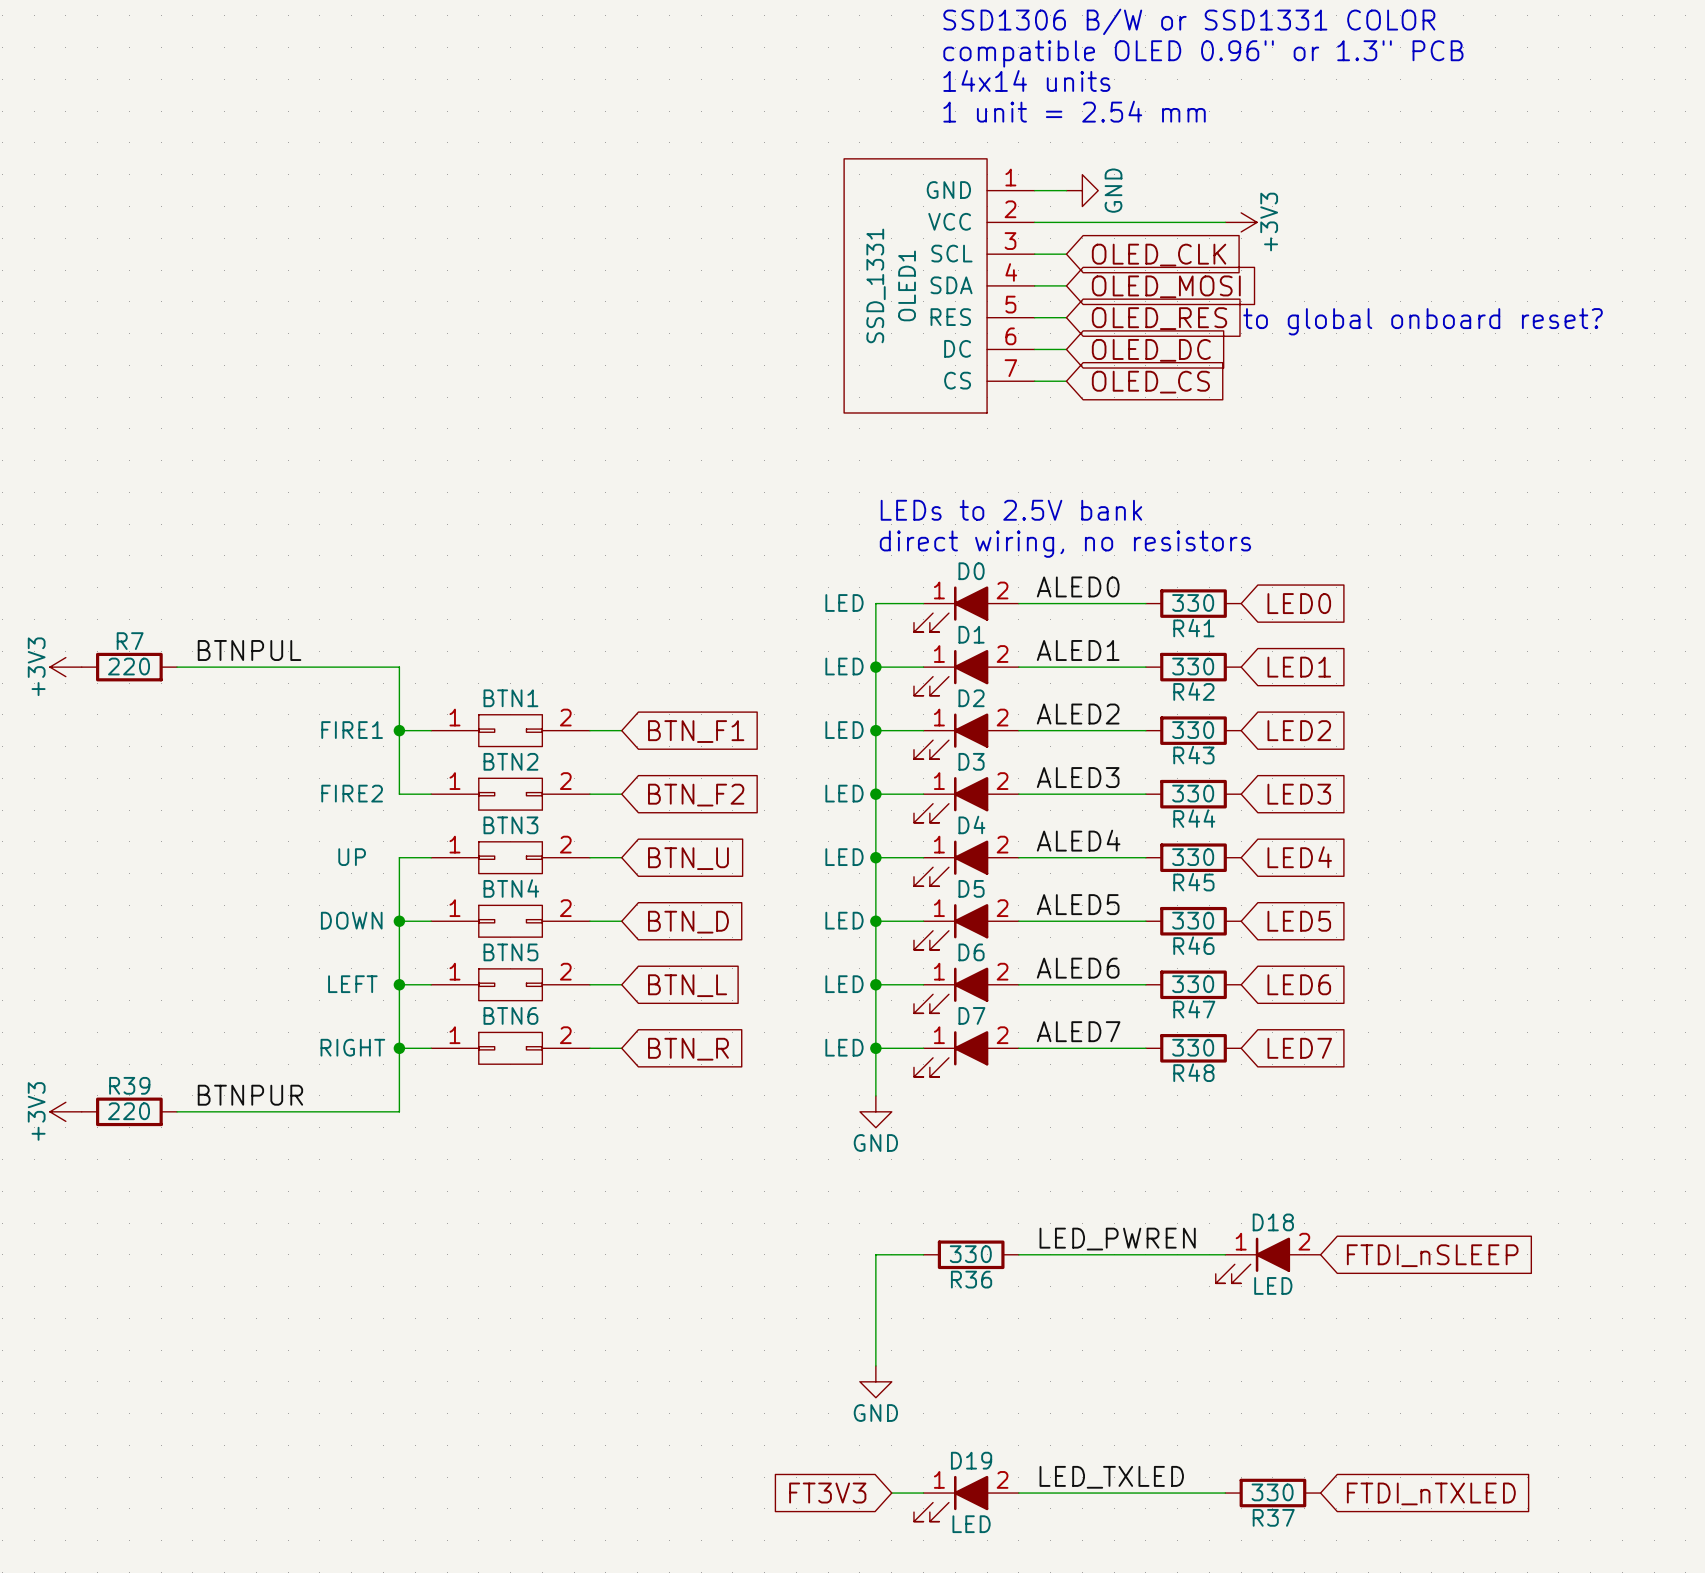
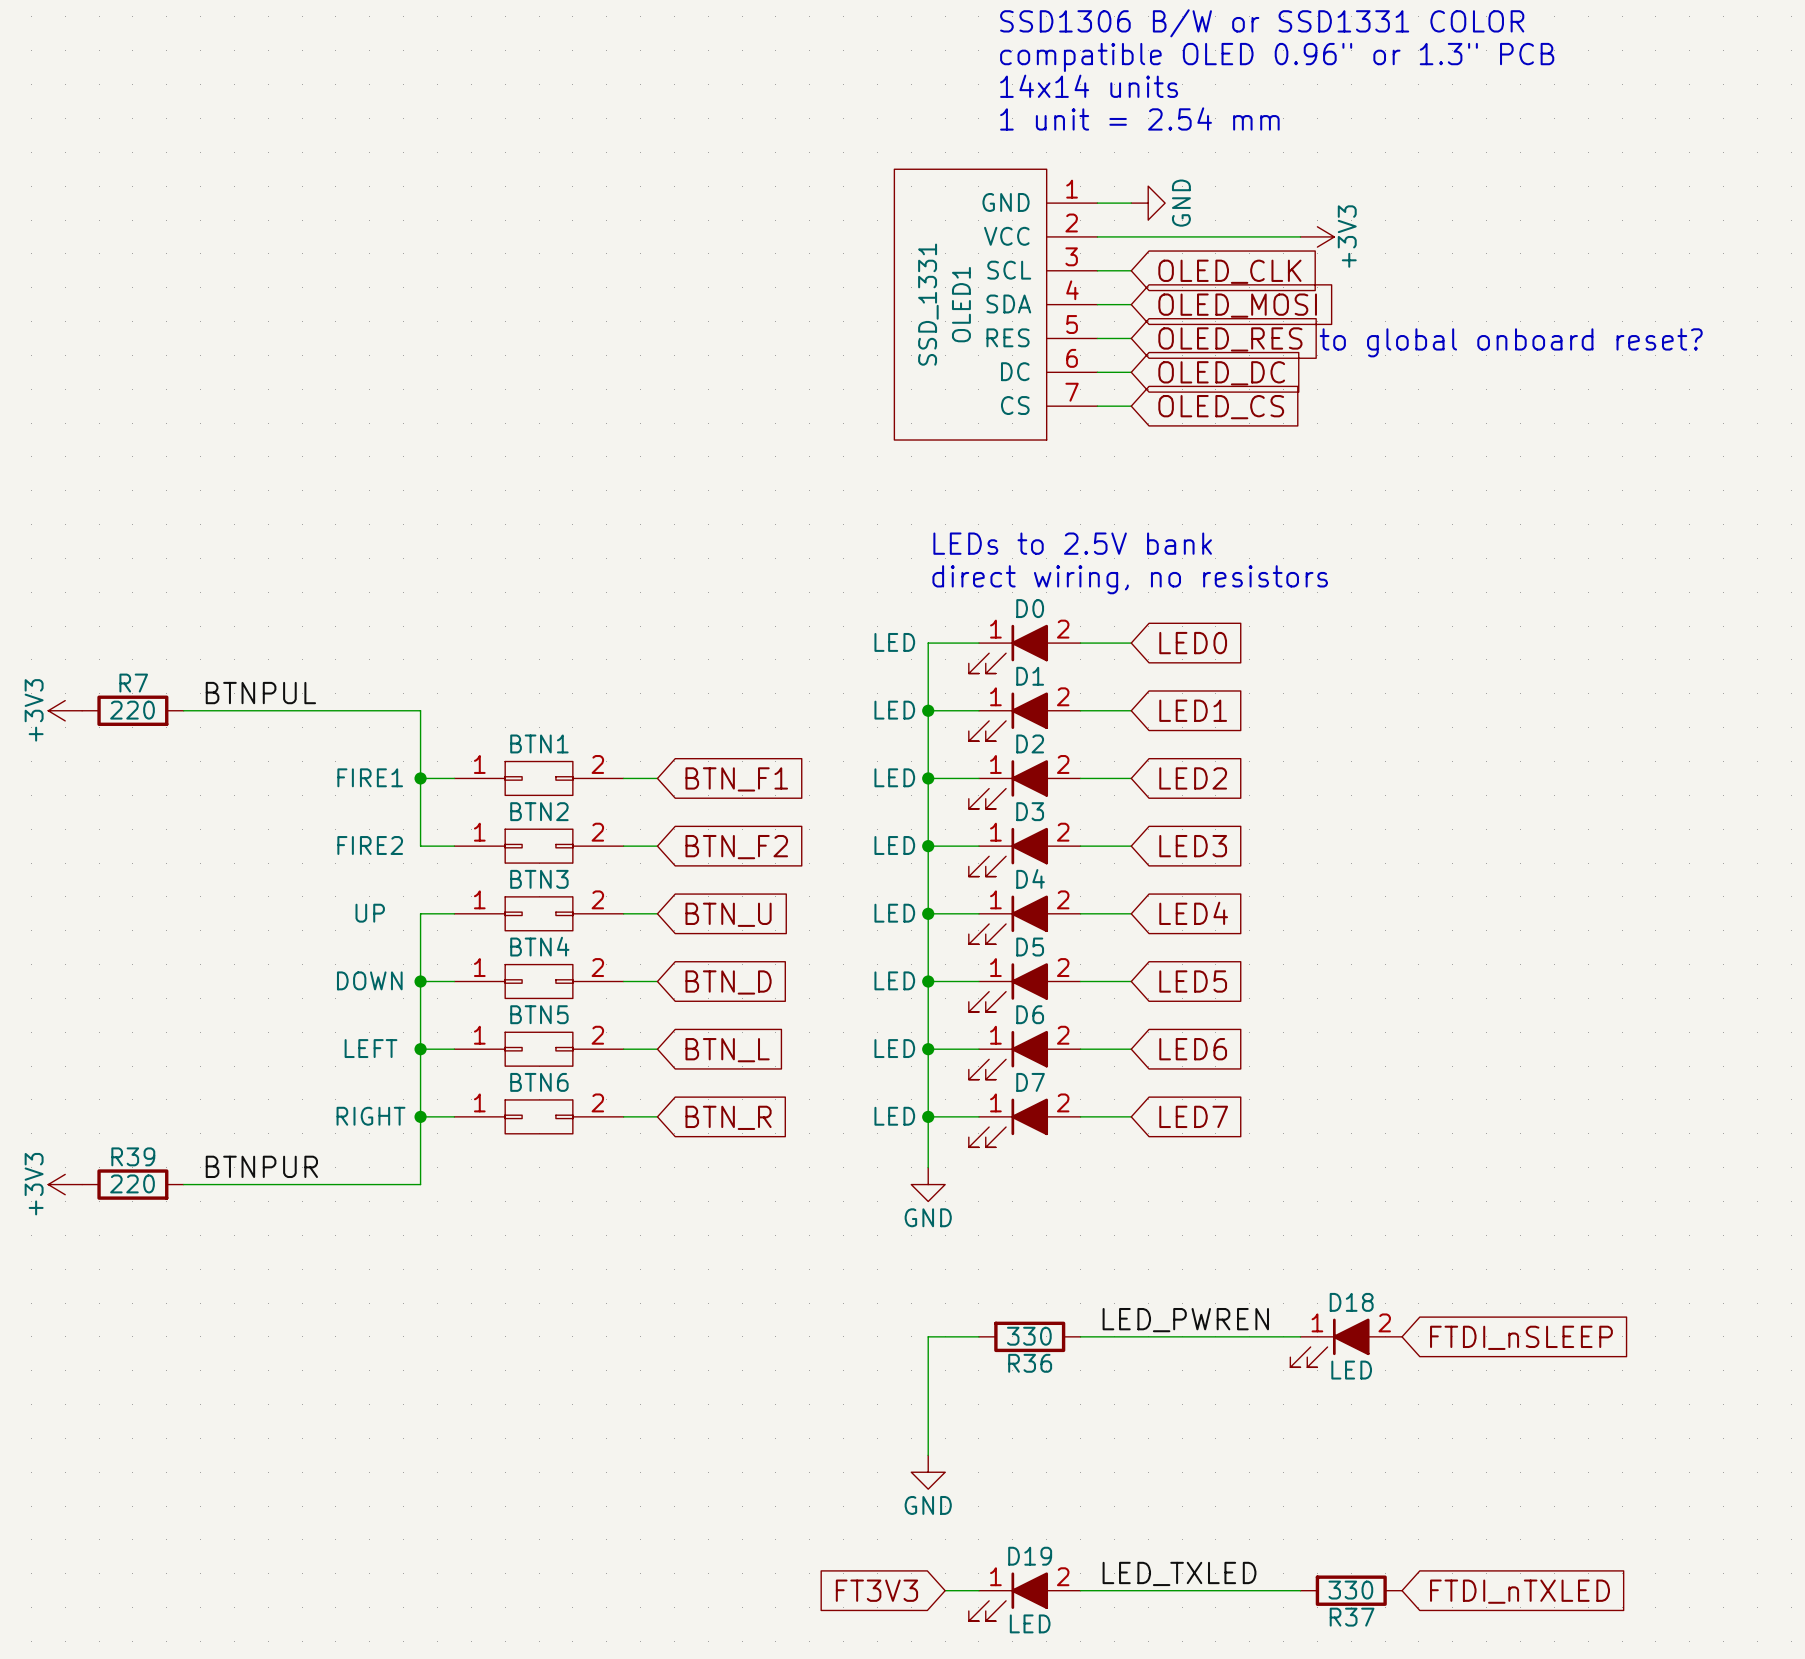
label: ALED0 (1078, 586) -> none
wire: (1066, 603) (1145, 603) -> none
R41: 330 (1193, 603) -> none
global label position: LED0 (1299, 603) -> LED0 (1193, 643)
label: ALED1 (1078, 650) -> none
wire: (1066, 667) (1145, 667) -> none
R42: 330 (1193, 667) -> none
global label position: LED1 (1299, 667) -> LED1 (1193, 710)
label: ALED2 (1078, 714) -> none
wire: (1066, 730) (1145, 730) -> none
R43: 330 (1193, 730) -> none
global label position: LED2 (1299, 730) -> LED2 (1193, 778)
label: ALED3 (1078, 777) -> none
wire: (1066, 794) (1145, 794) -> none
R44: 330 (1193, 794) -> none
global label position: LED3 (1299, 794) -> LED3 (1193, 846)
label: ALED4 (1078, 840) -> none
wire: (1066, 857) (1145, 857) -> none
R45: 330 (1193, 857) -> none
global label position: LED4 (1299, 857) -> LED4 (1193, 913)
label: ALED5 (1078, 904) -> none
wire: (1066, 921) (1145, 921) -> none
R46: 330 (1193, 921) -> none
global label position: LED5 (1299, 921) -> LED5 (1193, 981)
label: ALED6 (1078, 968) -> none
wire: (1066, 984) (1145, 984) -> none
R47: 330 (1193, 984) -> none
global label position: LED6 (1299, 984) -> LED6 (1193, 1049)
label: ALED7 (1078, 1031) -> none
wire: (1066, 1048) (1145, 1048) -> none
R48: 330 (1193, 1048) -> none
global label position: LED7 (1299, 1048) -> LED7 (1193, 1116)

